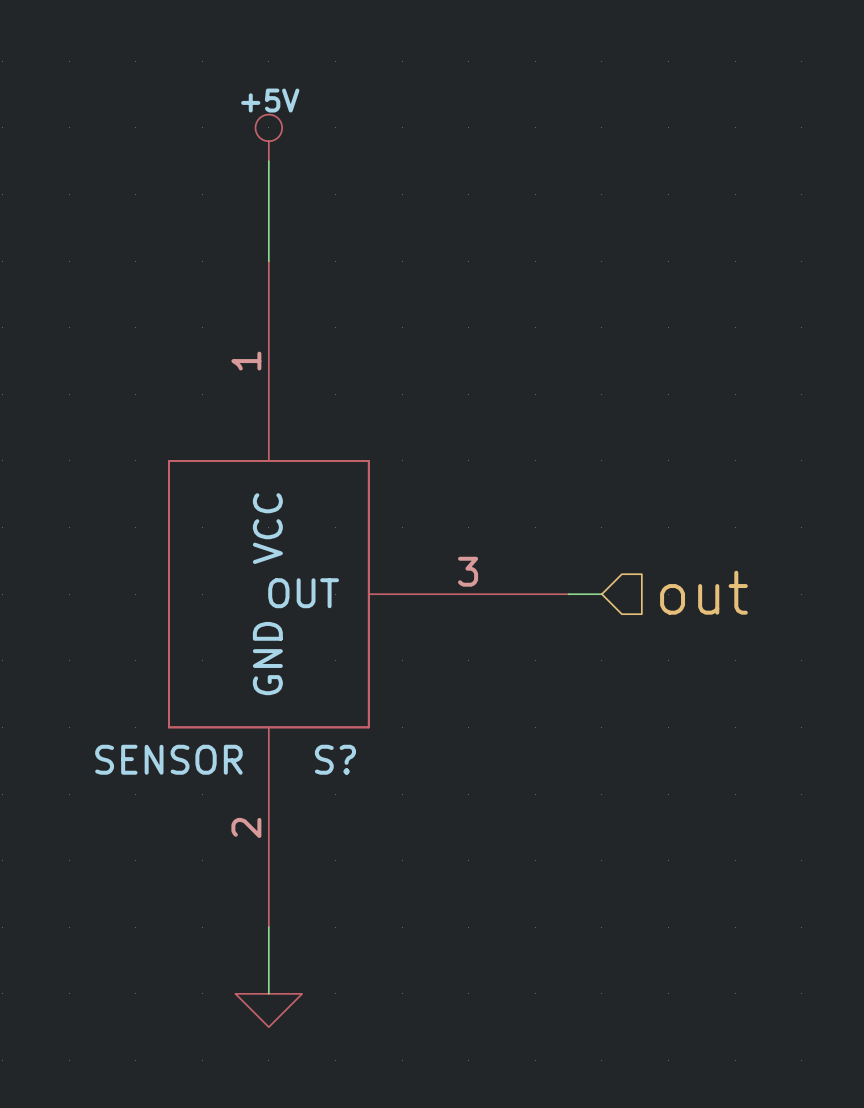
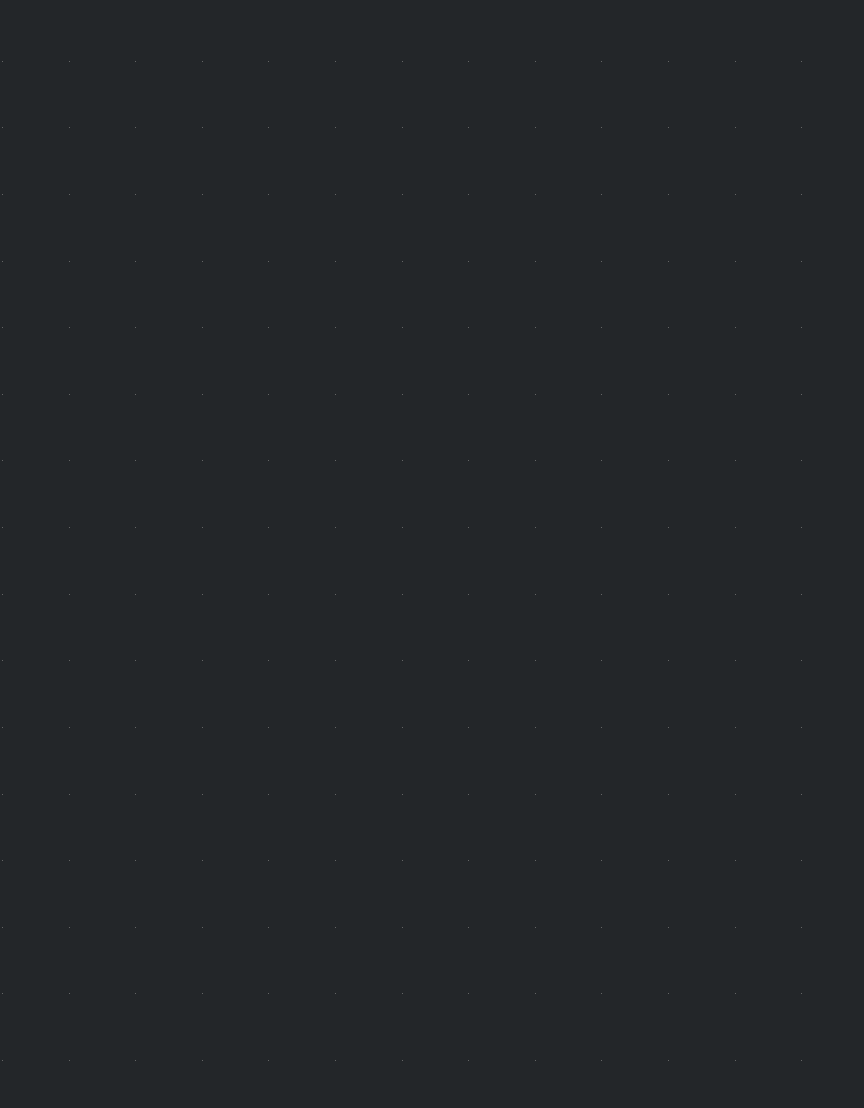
power symbol: +5V (268, 137) -> none
wire: (268, 161) (268, 261) -> none
hierarchical label: out (703, 592) -> none
S?: SENSOR (368, 594) -> none
wire: (568, 594) (601, 594) -> none
wire: (268, 927) (268, 993) -> none
power symbol: (268, 1010) -> none

